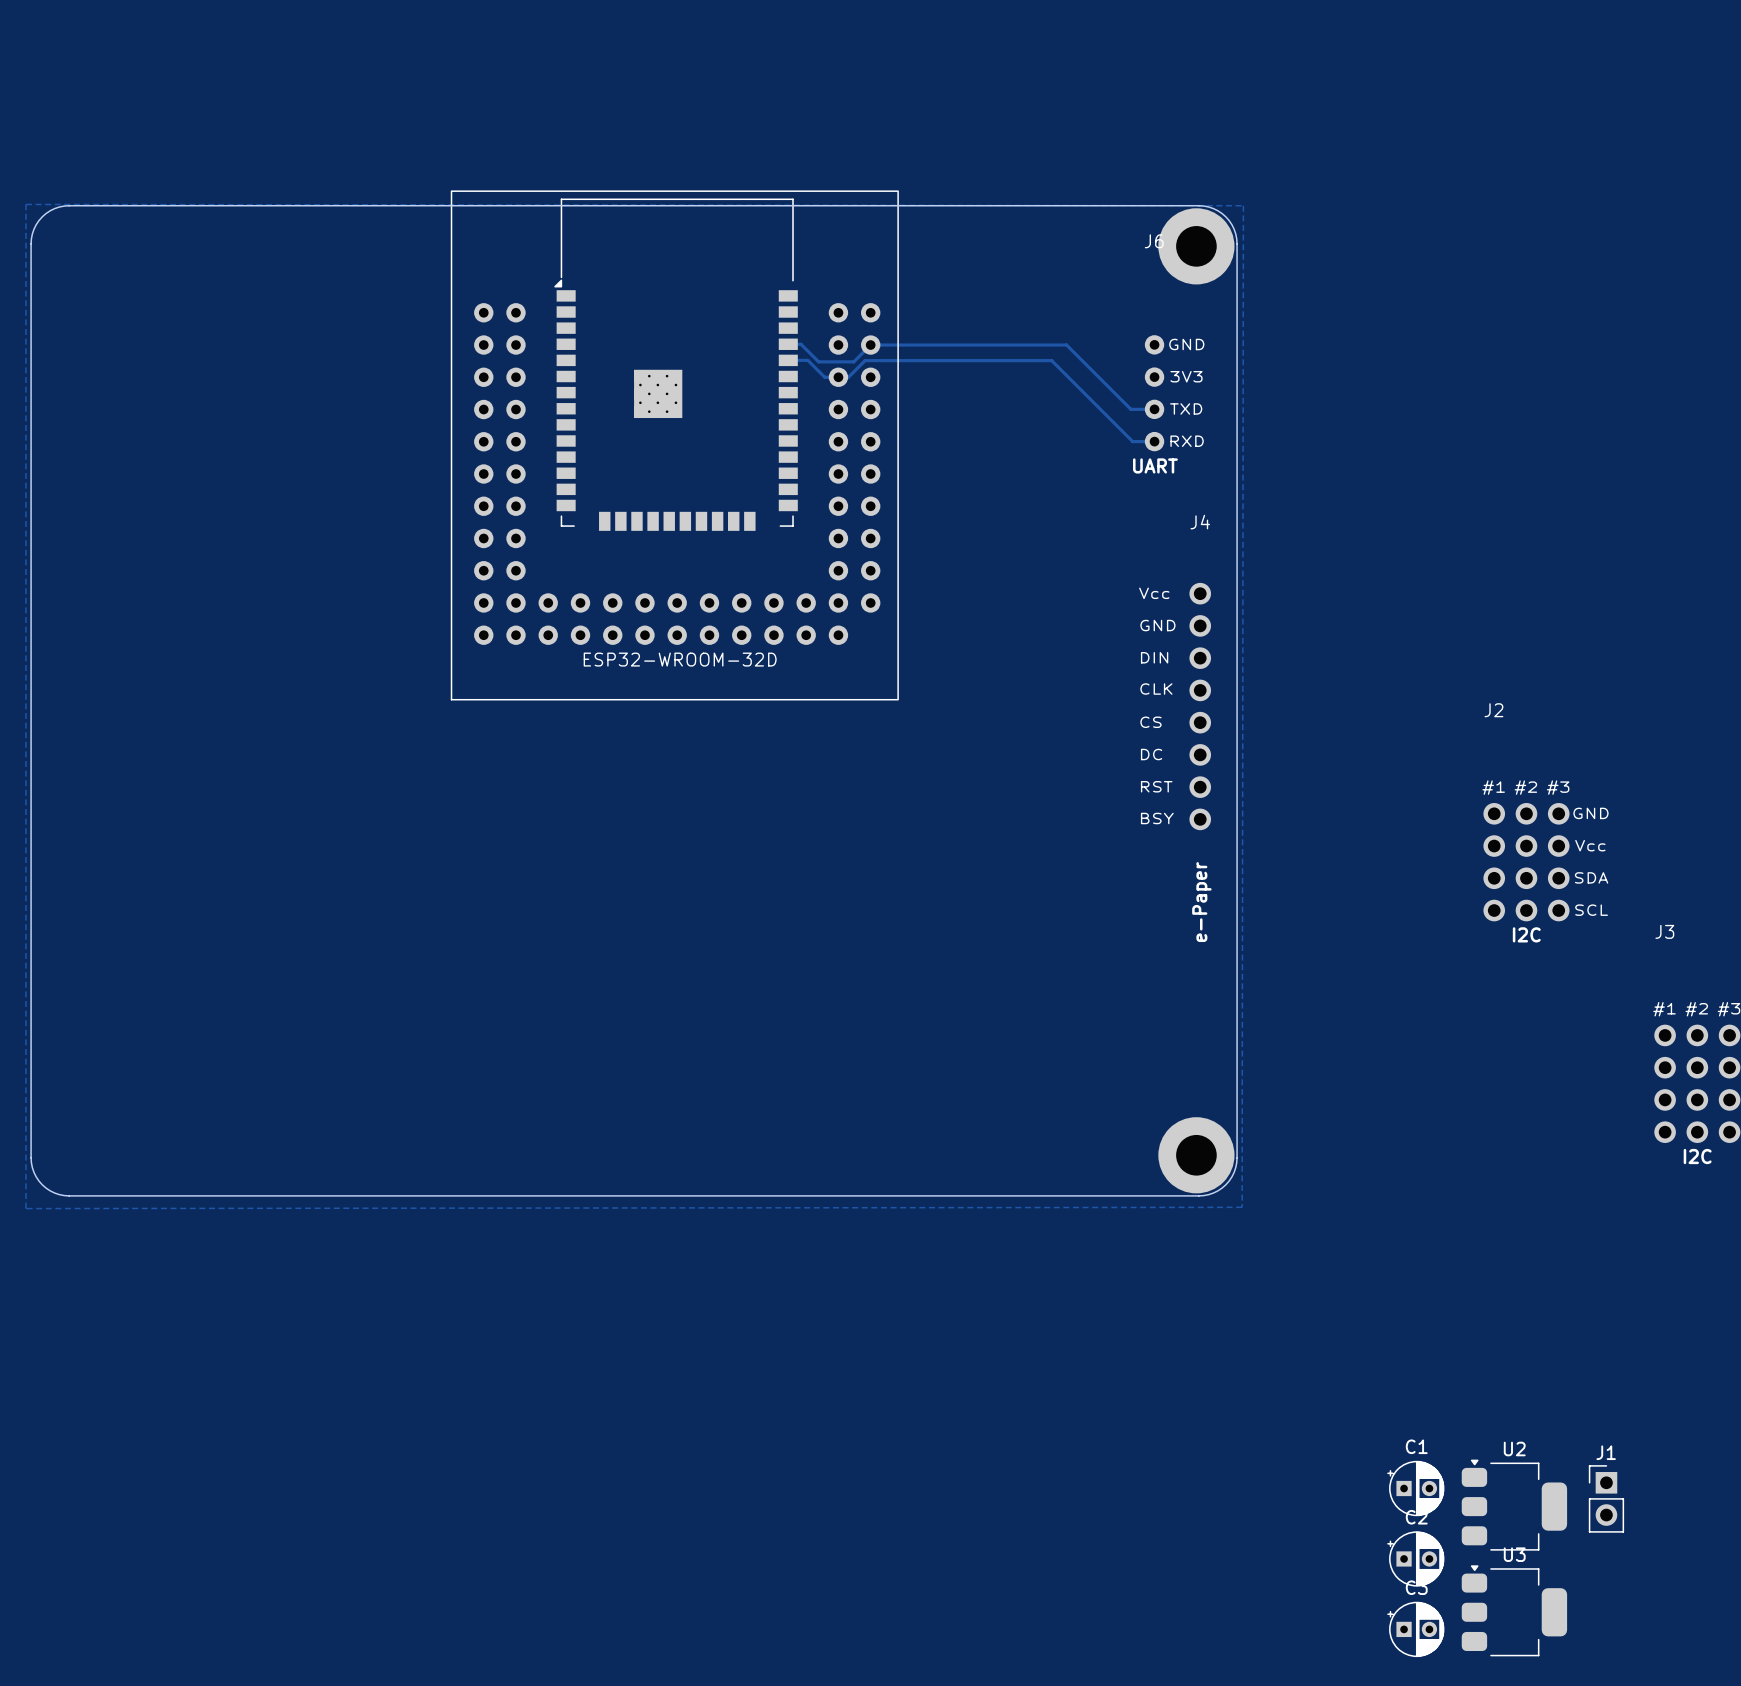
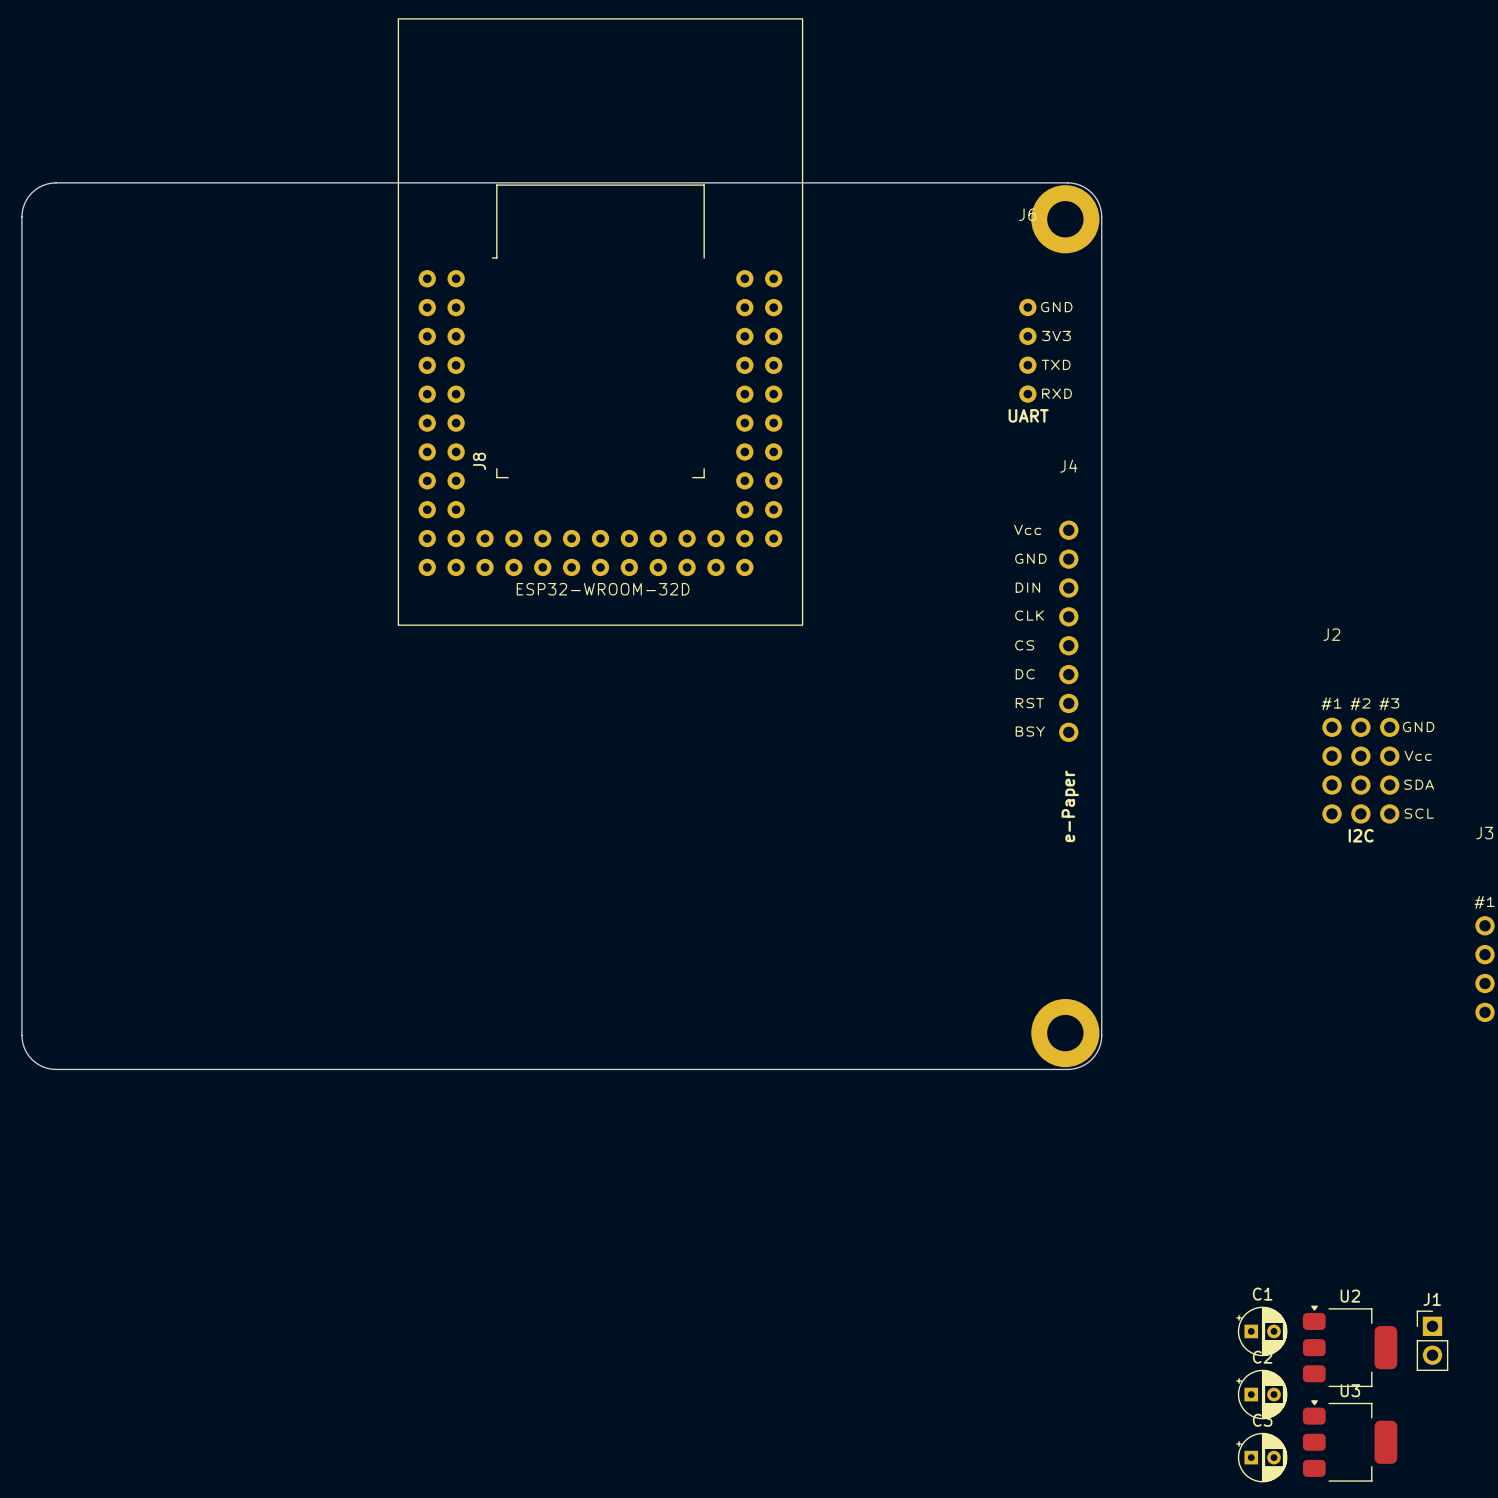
zone outline: (26, 204) (1243, 205) (1242, 1207) (26, 1208) (26, 204) -> none
track: (788, 344) (800, 344) (818, 361) (853, 361) (870, 345) (1066, 345) (1130, 409) (1154, 409) -> none
track: (788, 360) (807, 360) (824, 377) (848, 377) (865, 360) (1051, 360) (1132, 441) (1154, 441) -> none
J8: none -> (600, 322)
part: (674, 445) -> none

